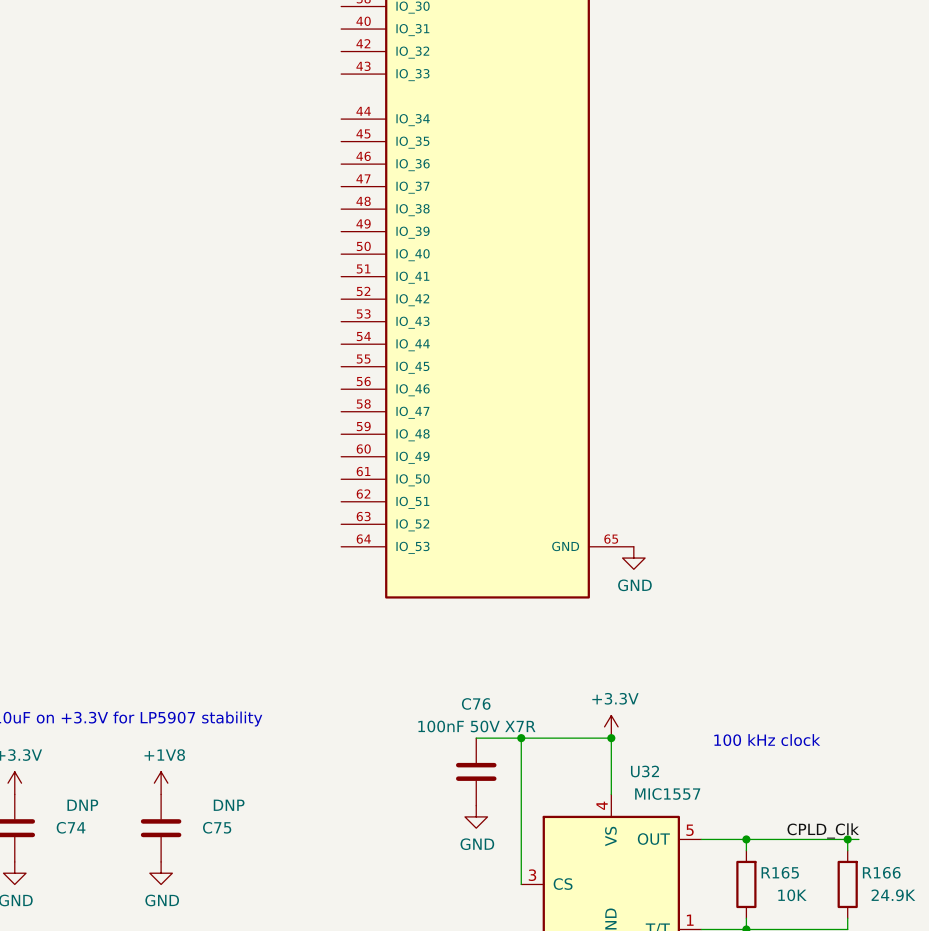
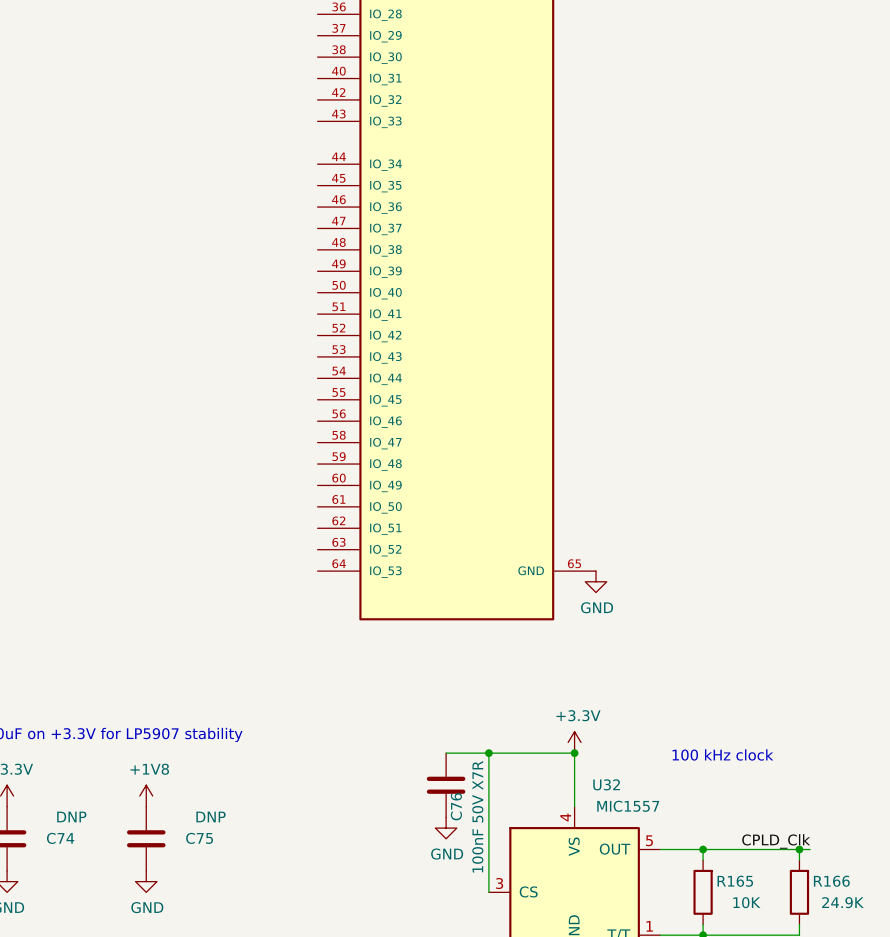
C76 name rotation: 0° (476, 703) -> 90° counterclockwise (456, 806)
C76 name position: C76 (476, 703) -> C76 (456, 806)
C76 value rotation: 0° (476, 726) -> 90° counterclockwise (477, 816)

